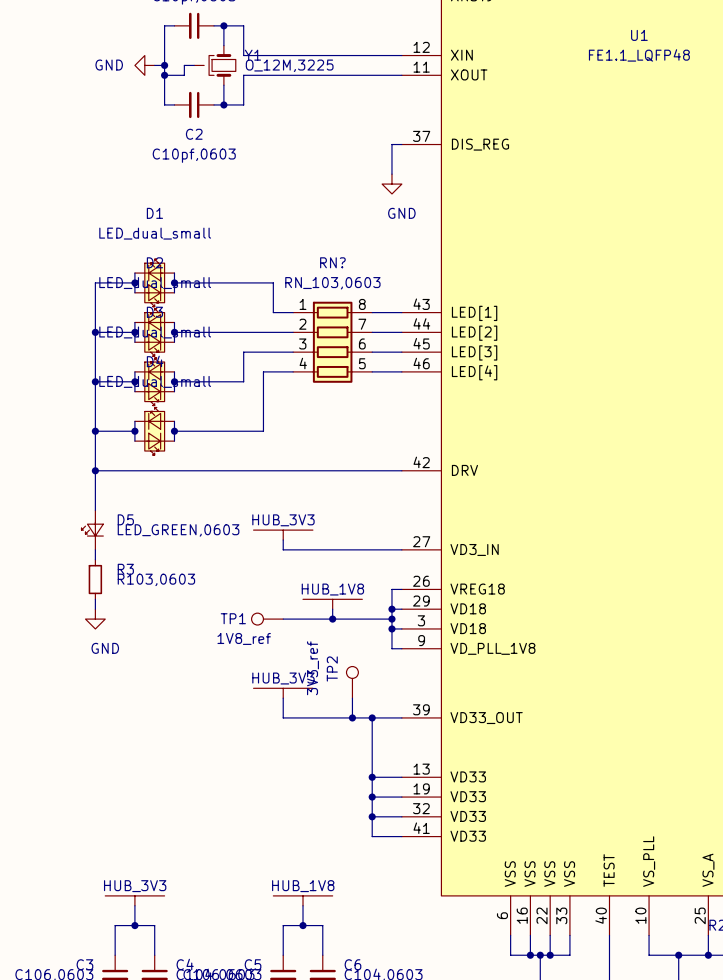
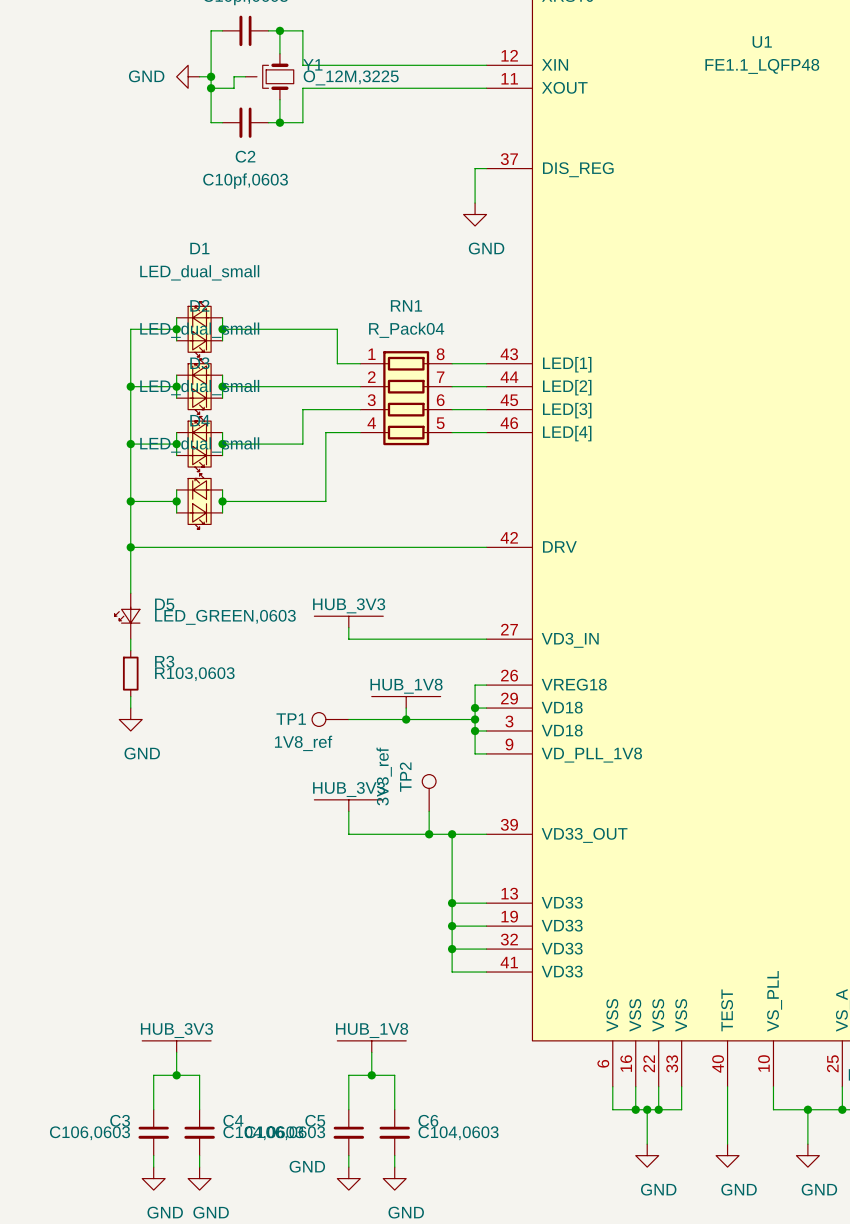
RN? name: RN? (332, 262) -> RN1 (406, 305)
RN? value: RN_103,0603 (332, 283) -> R_Pack04 (406, 330)

